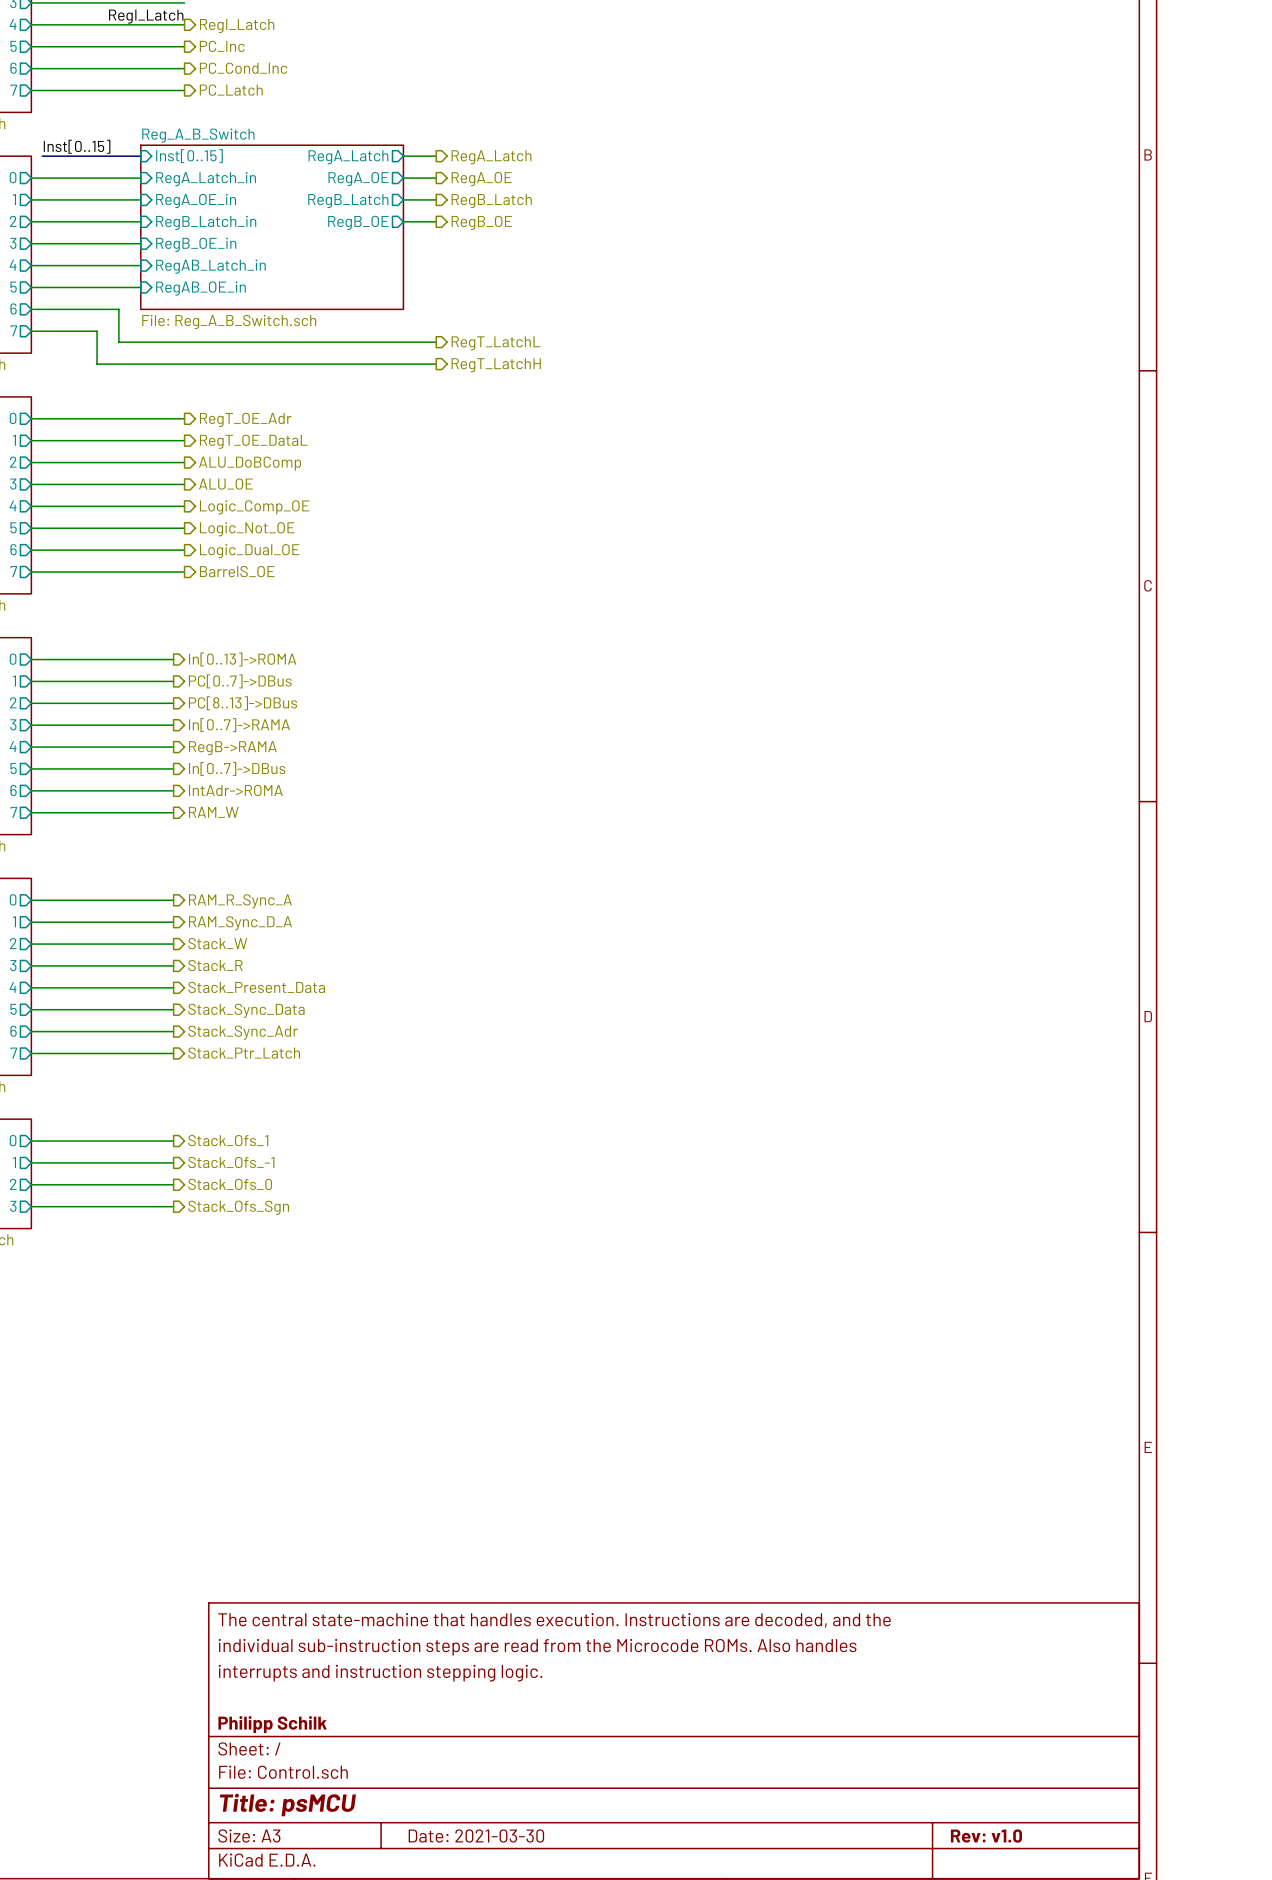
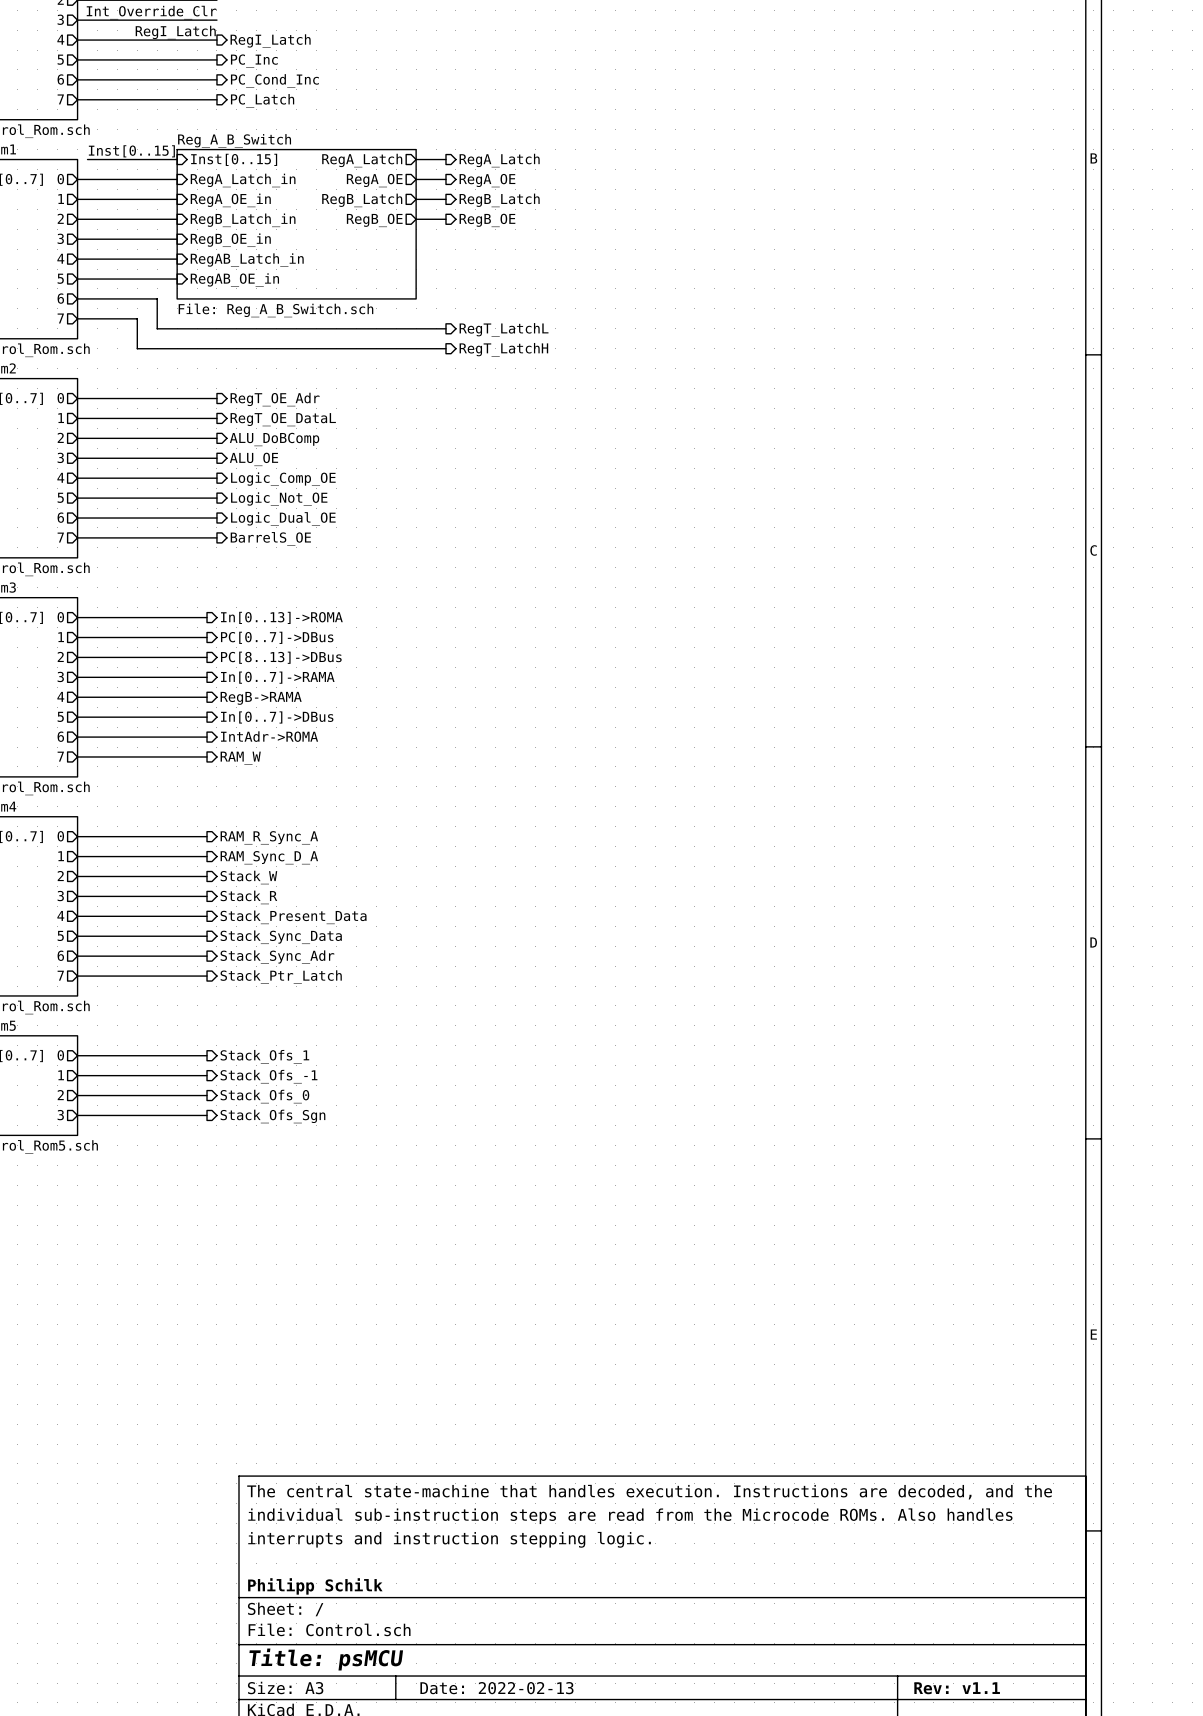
title block: Date: 2021-03-30 (476, 1836) -> Date: 2022-02-13 (496, 1688)
title block: Rev: v1.0 (986, 1836) -> Rev: v1.1 (957, 1688)

